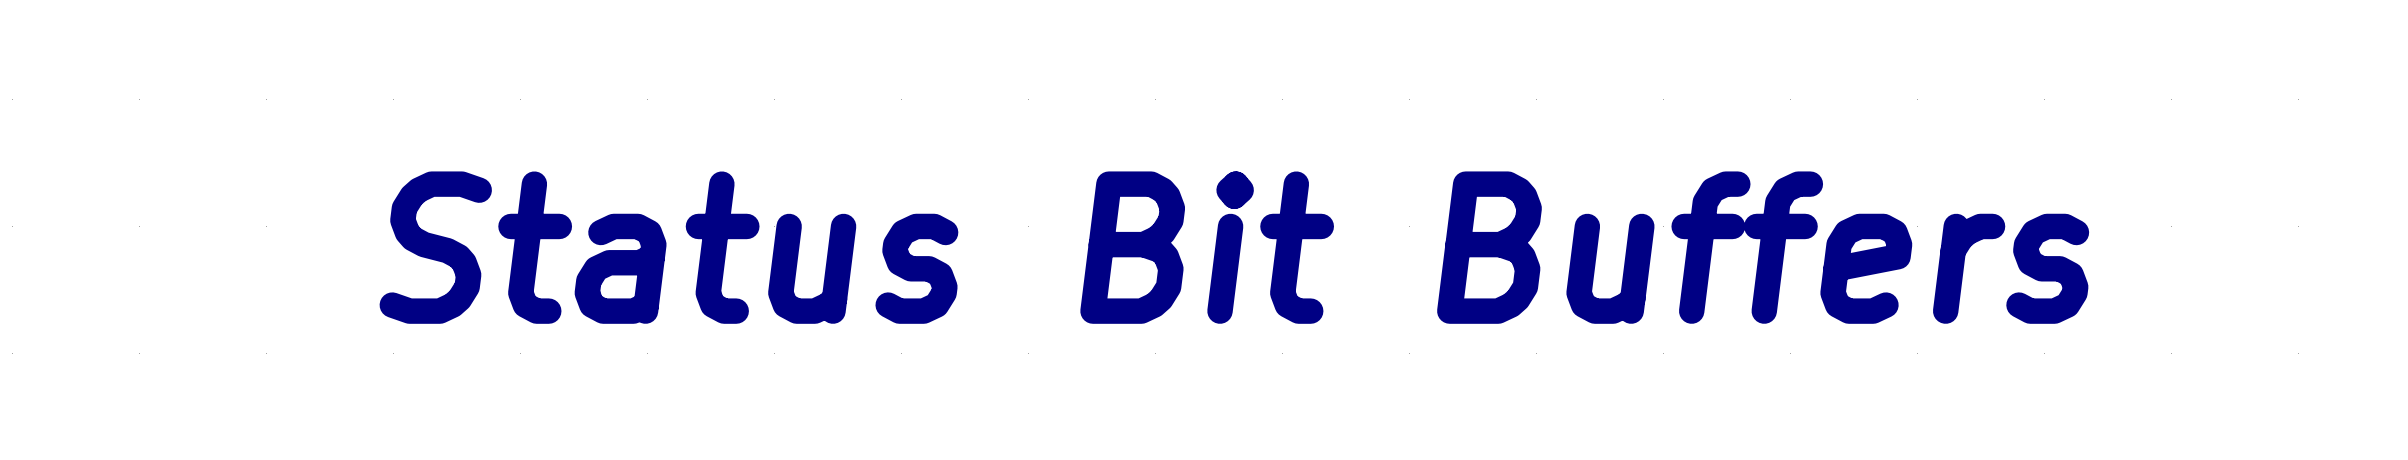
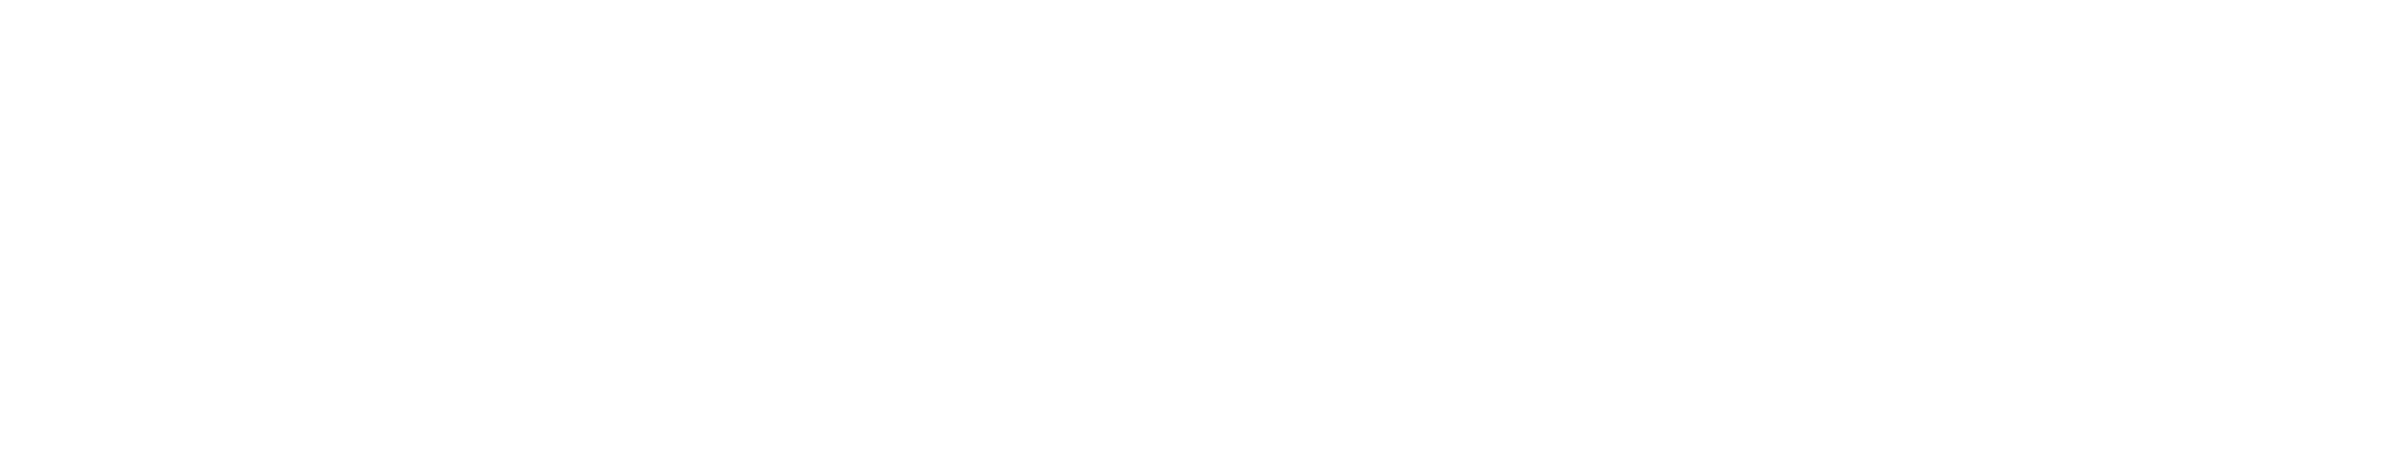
text: Status Bit Buffers (1234, 247) -> none

